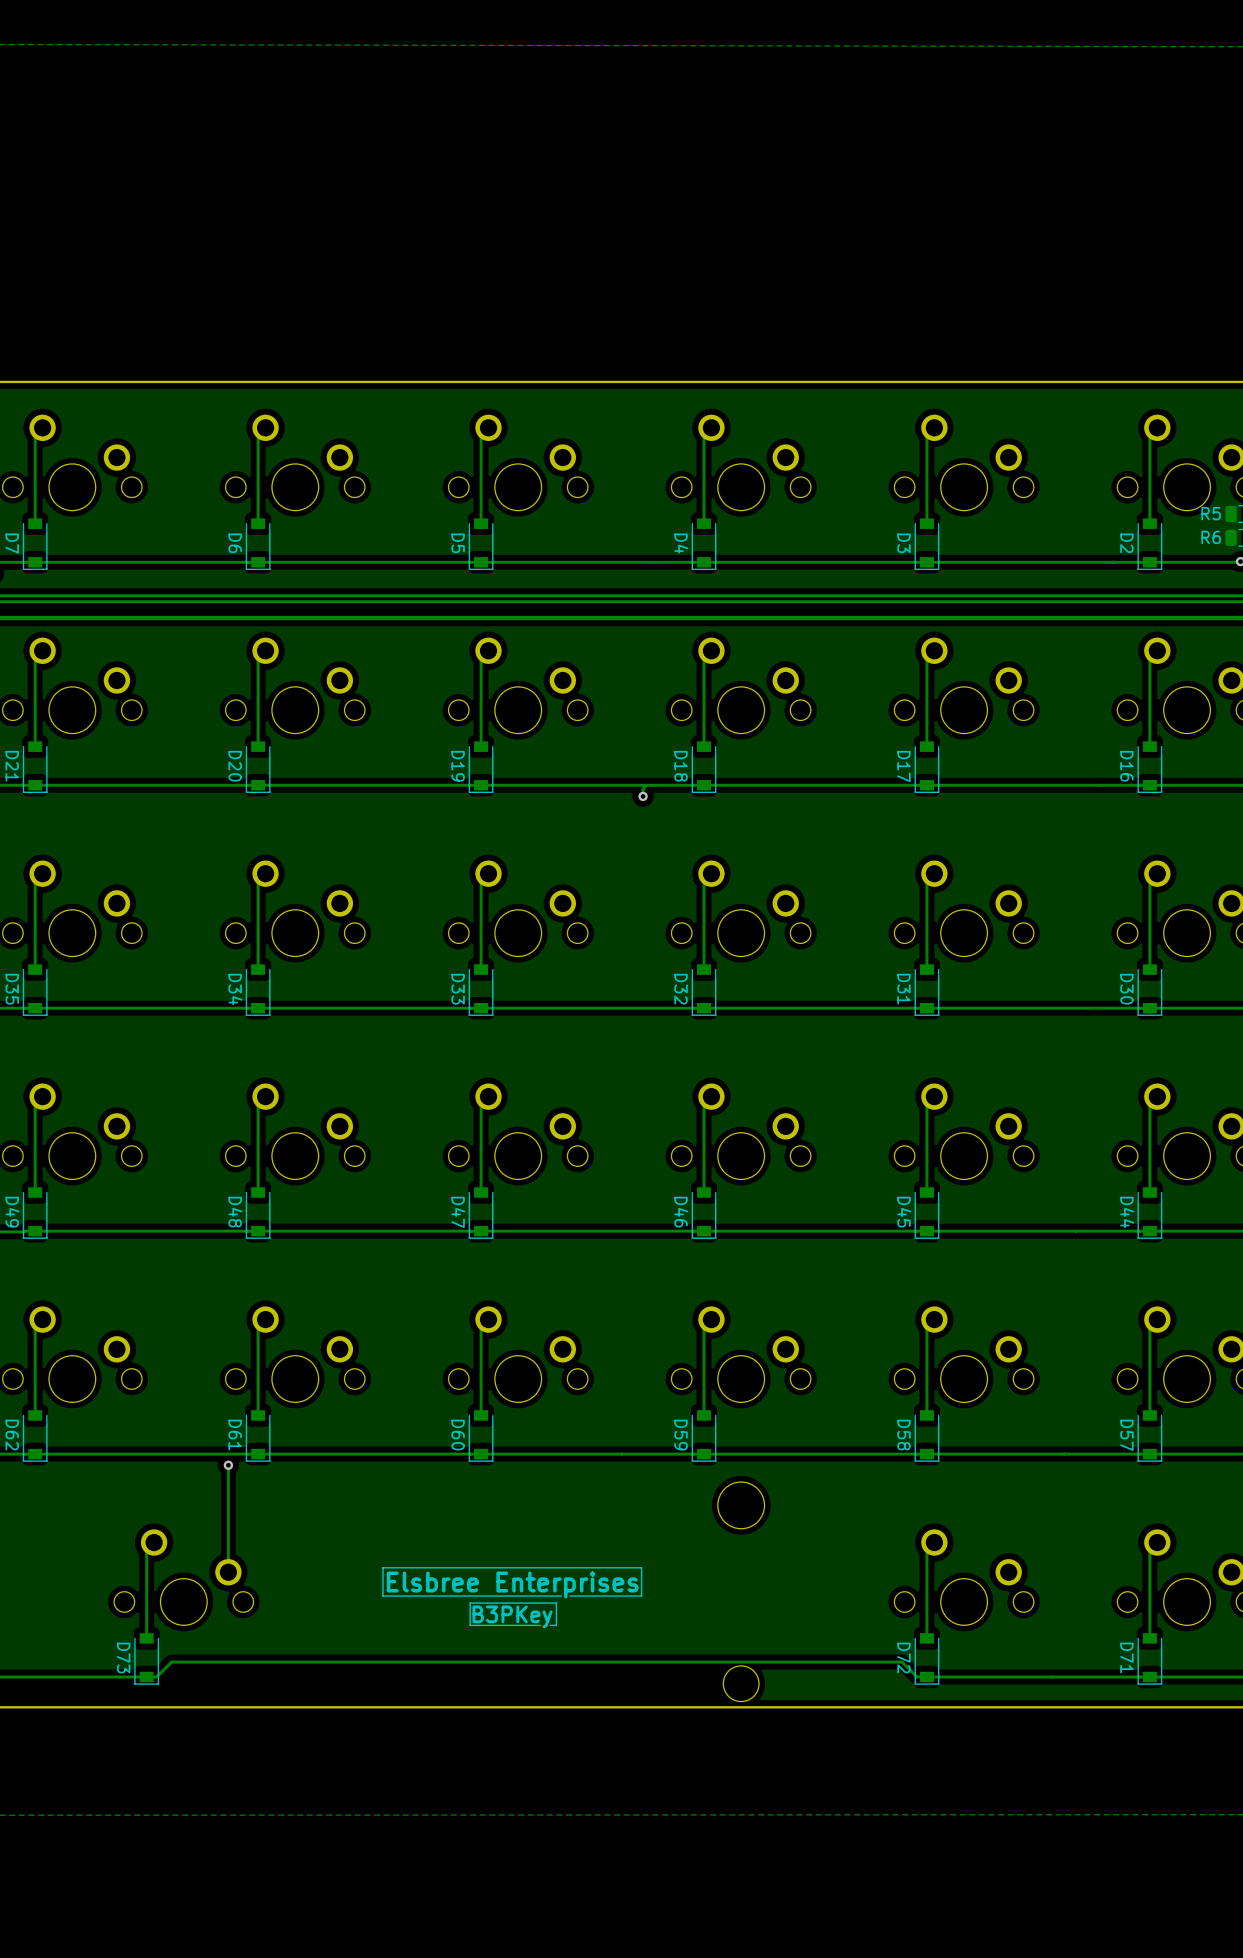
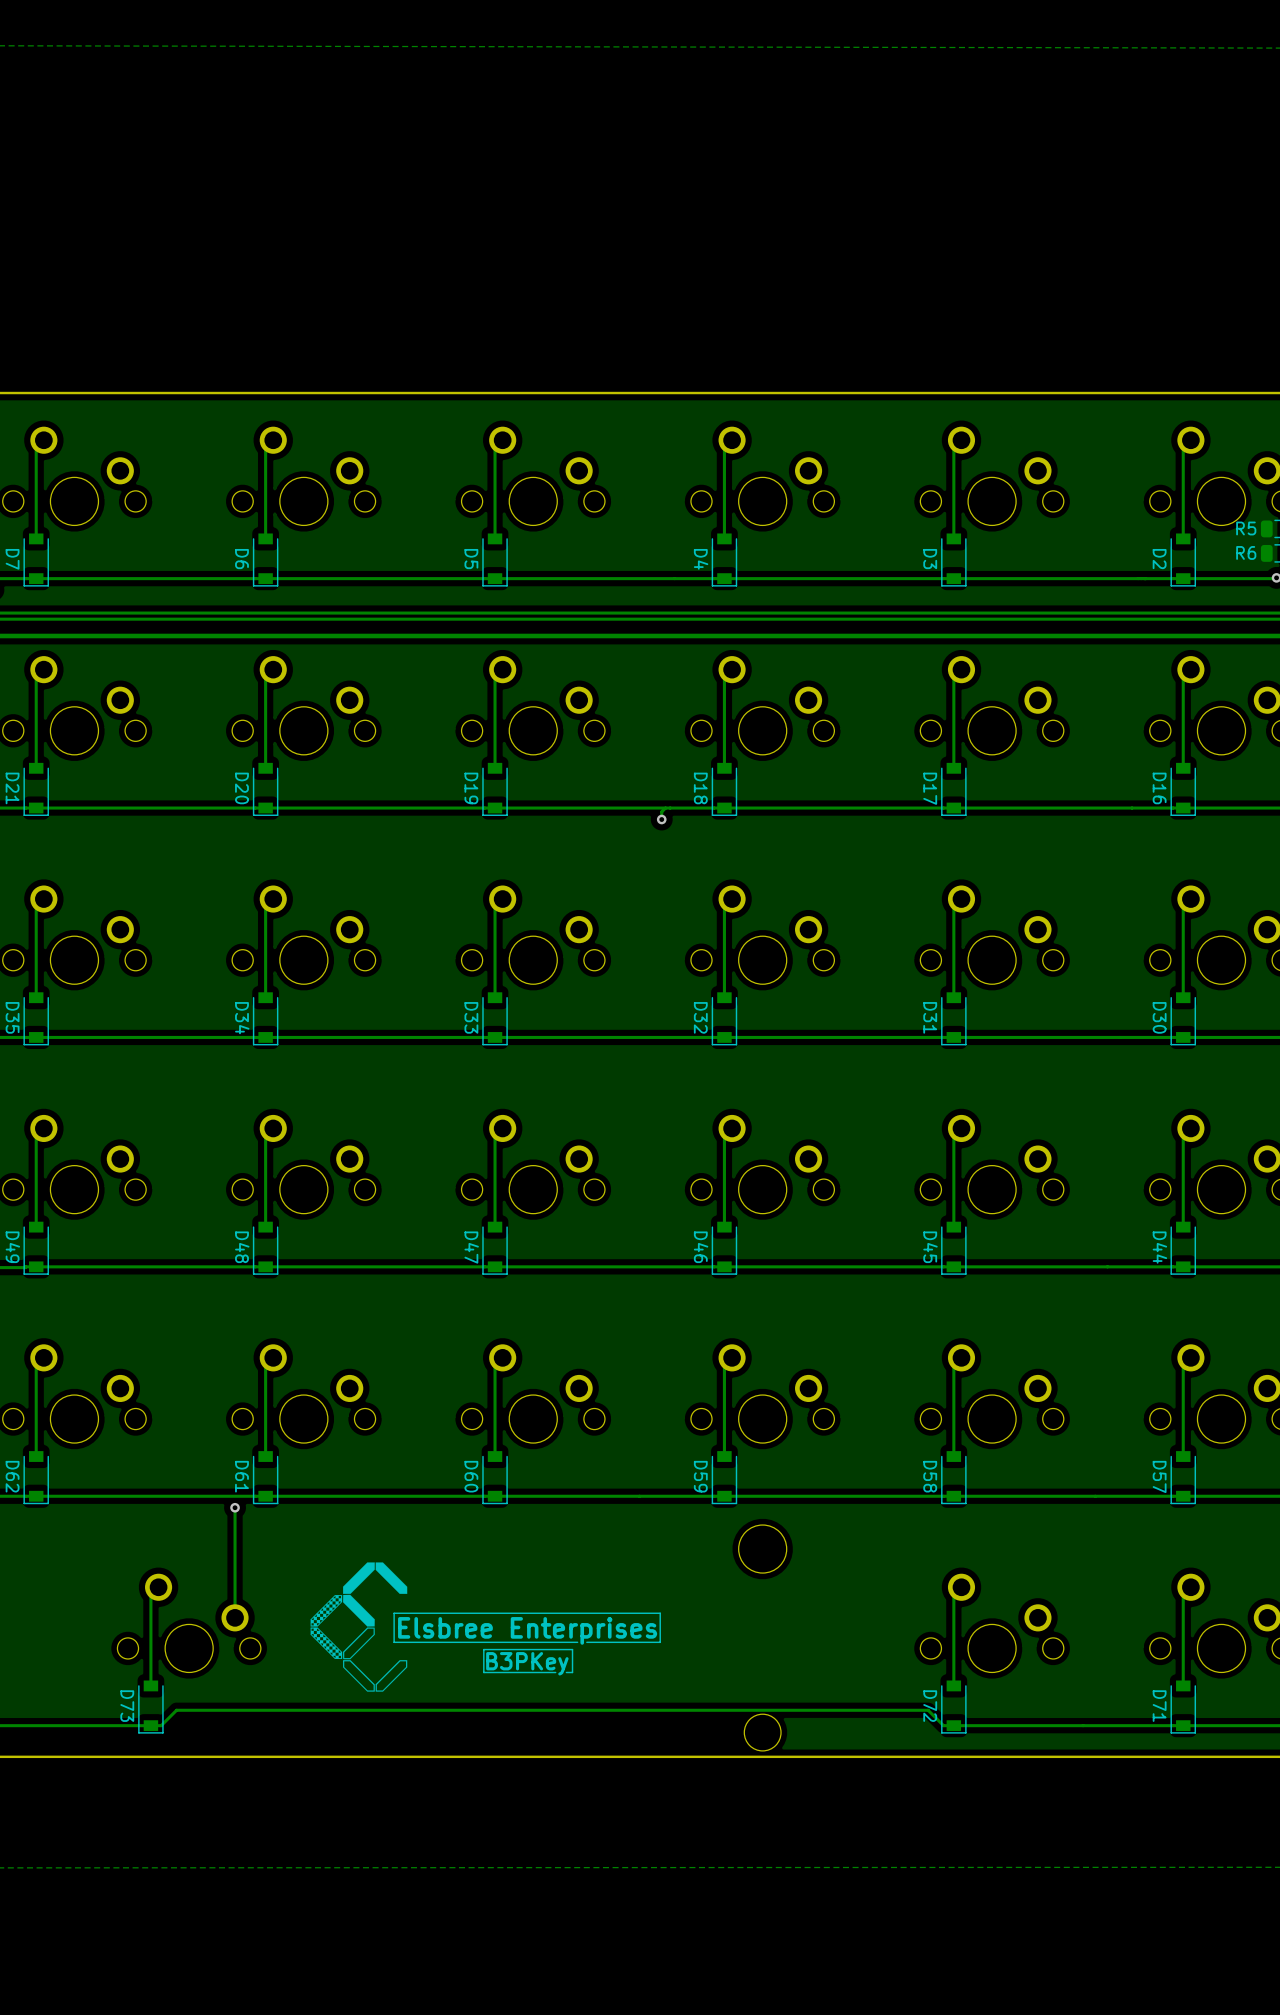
drawing: none -> [310, 1562, 408, 1692]

